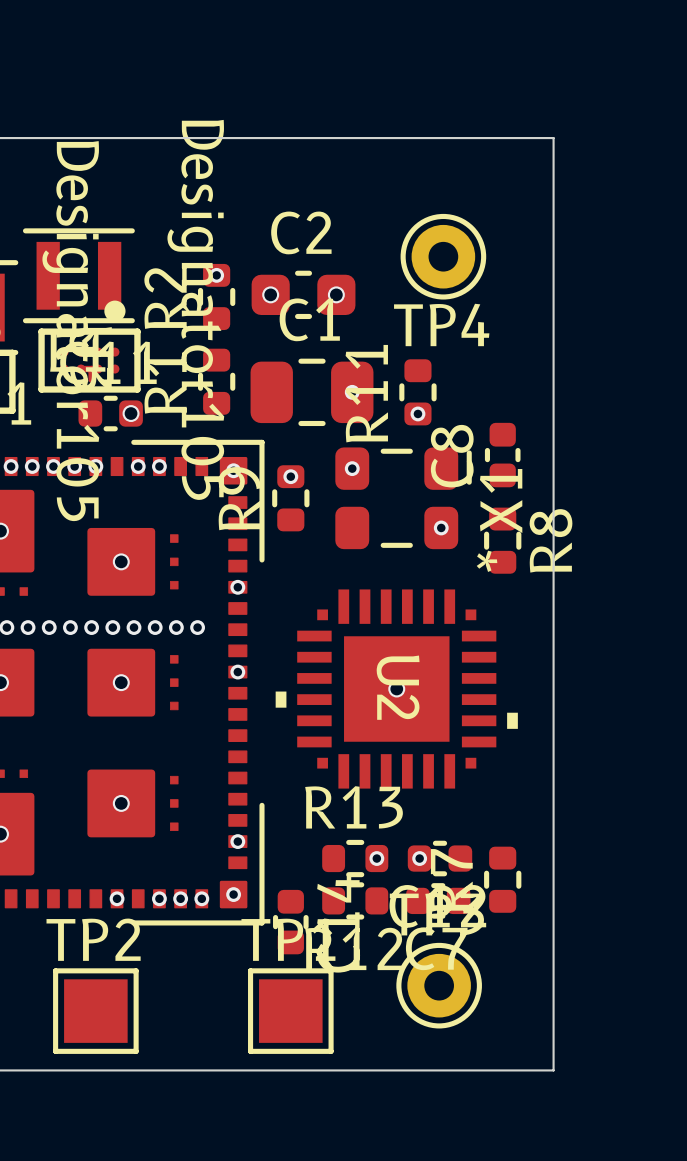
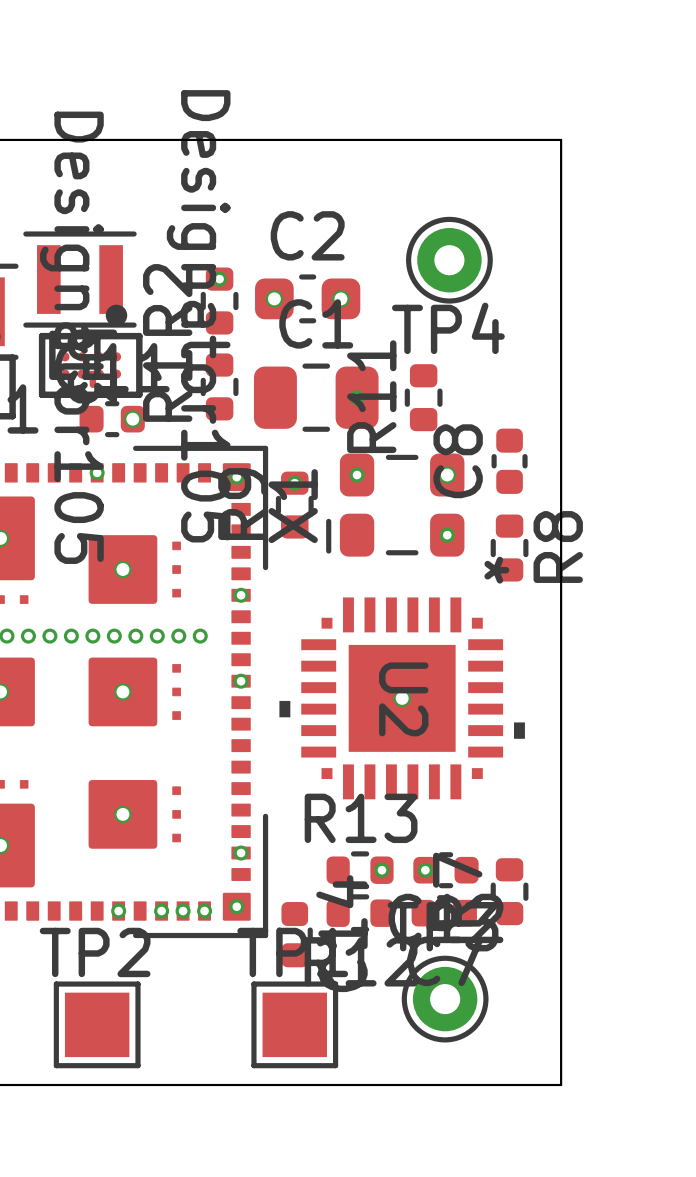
via: (417, 413) -> none
via: (11, 466) -> none
via: (32, 466) -> none
via: (53, 466) -> none
via: (74, 466) -> none
via: (138, 466) -> none
via: (159, 466) -> none
via: none -> (447, 475)
X1 rotation: 0° (403, 498) -> 180° (395, 505)

